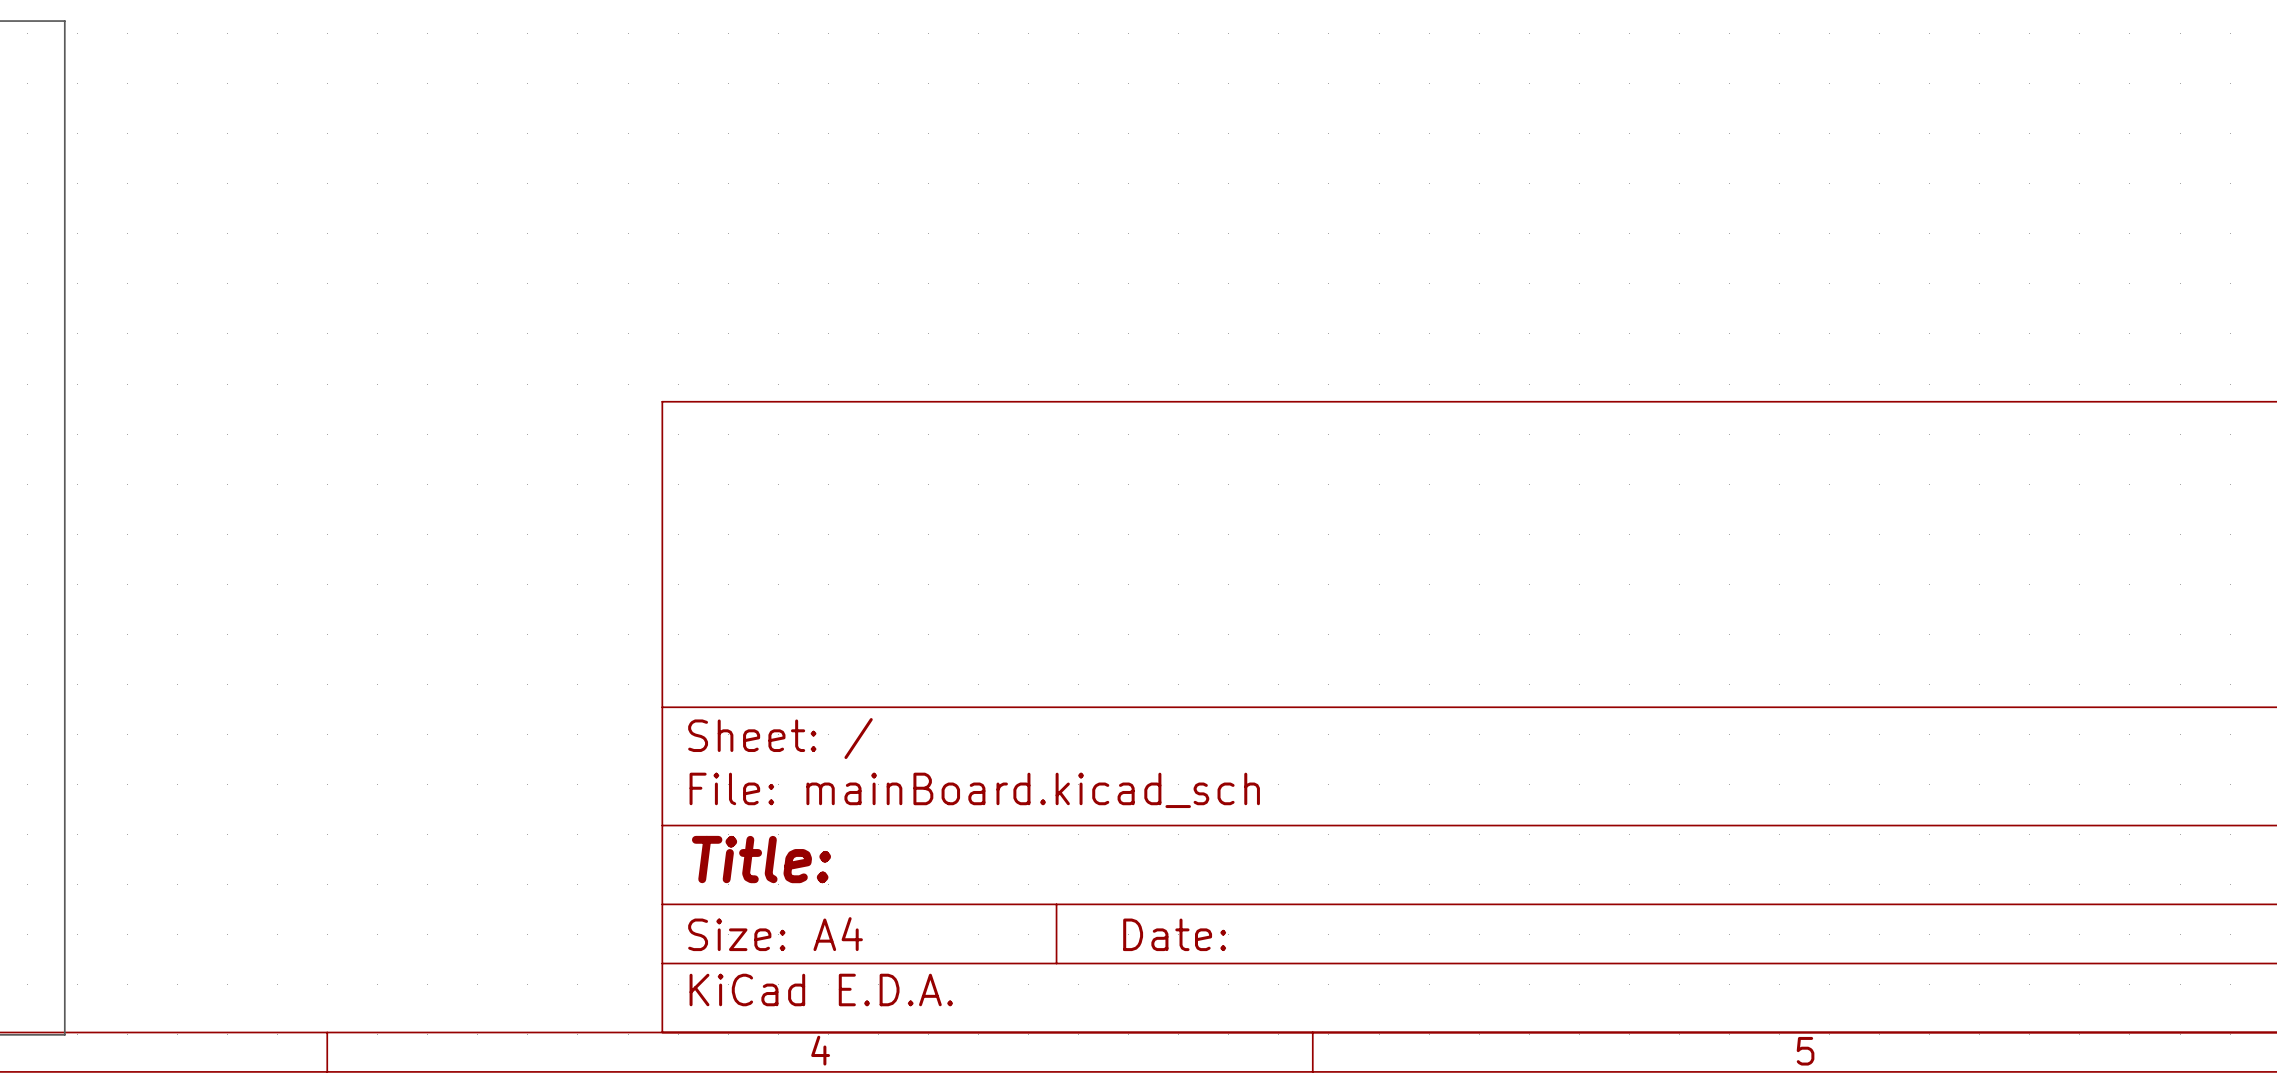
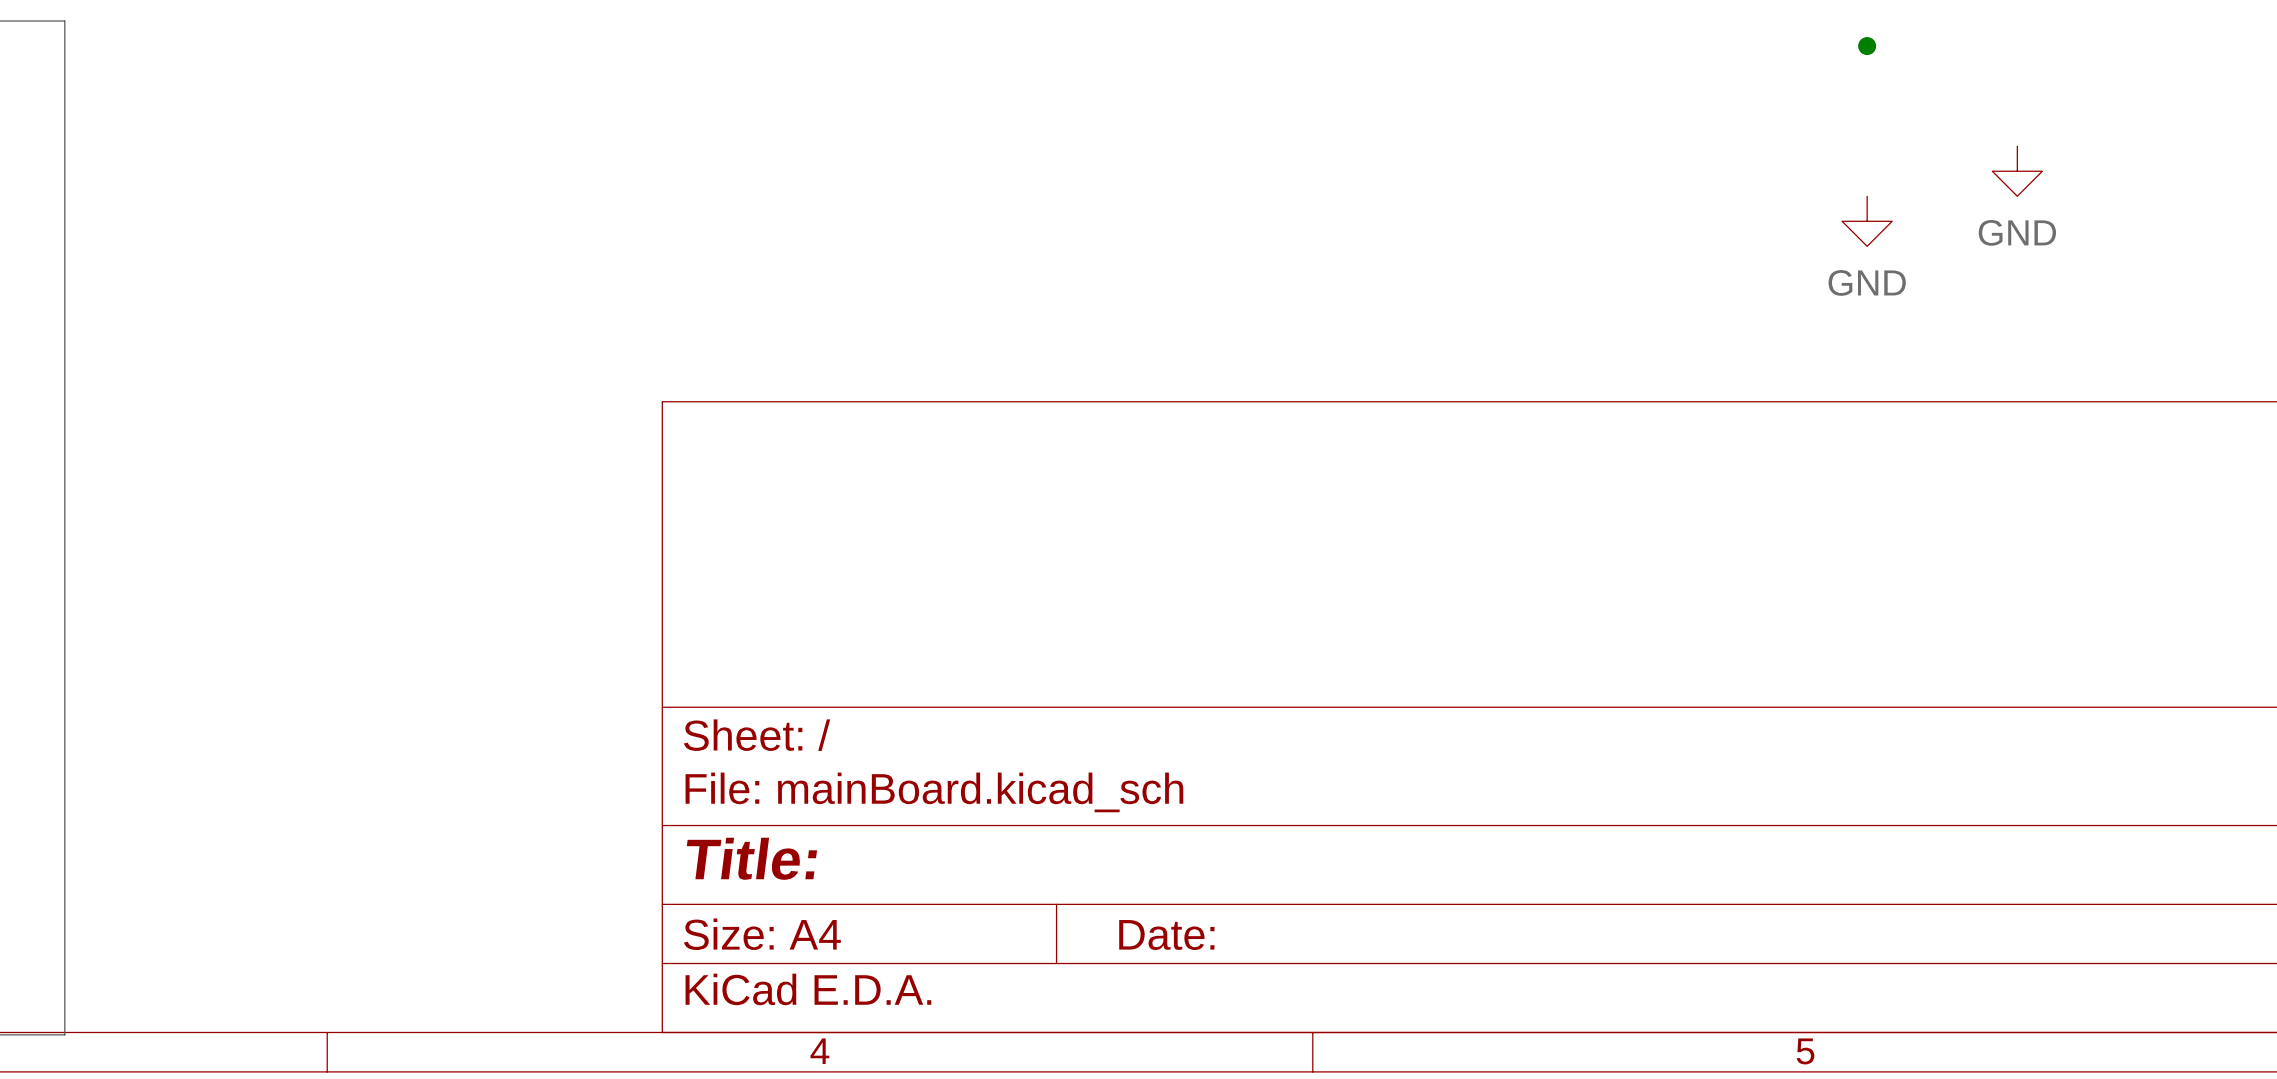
junction: none -> (1867, 46)
power symbol: none -> GND (2017, 171)
power symbol: none -> GND (1867, 221)

